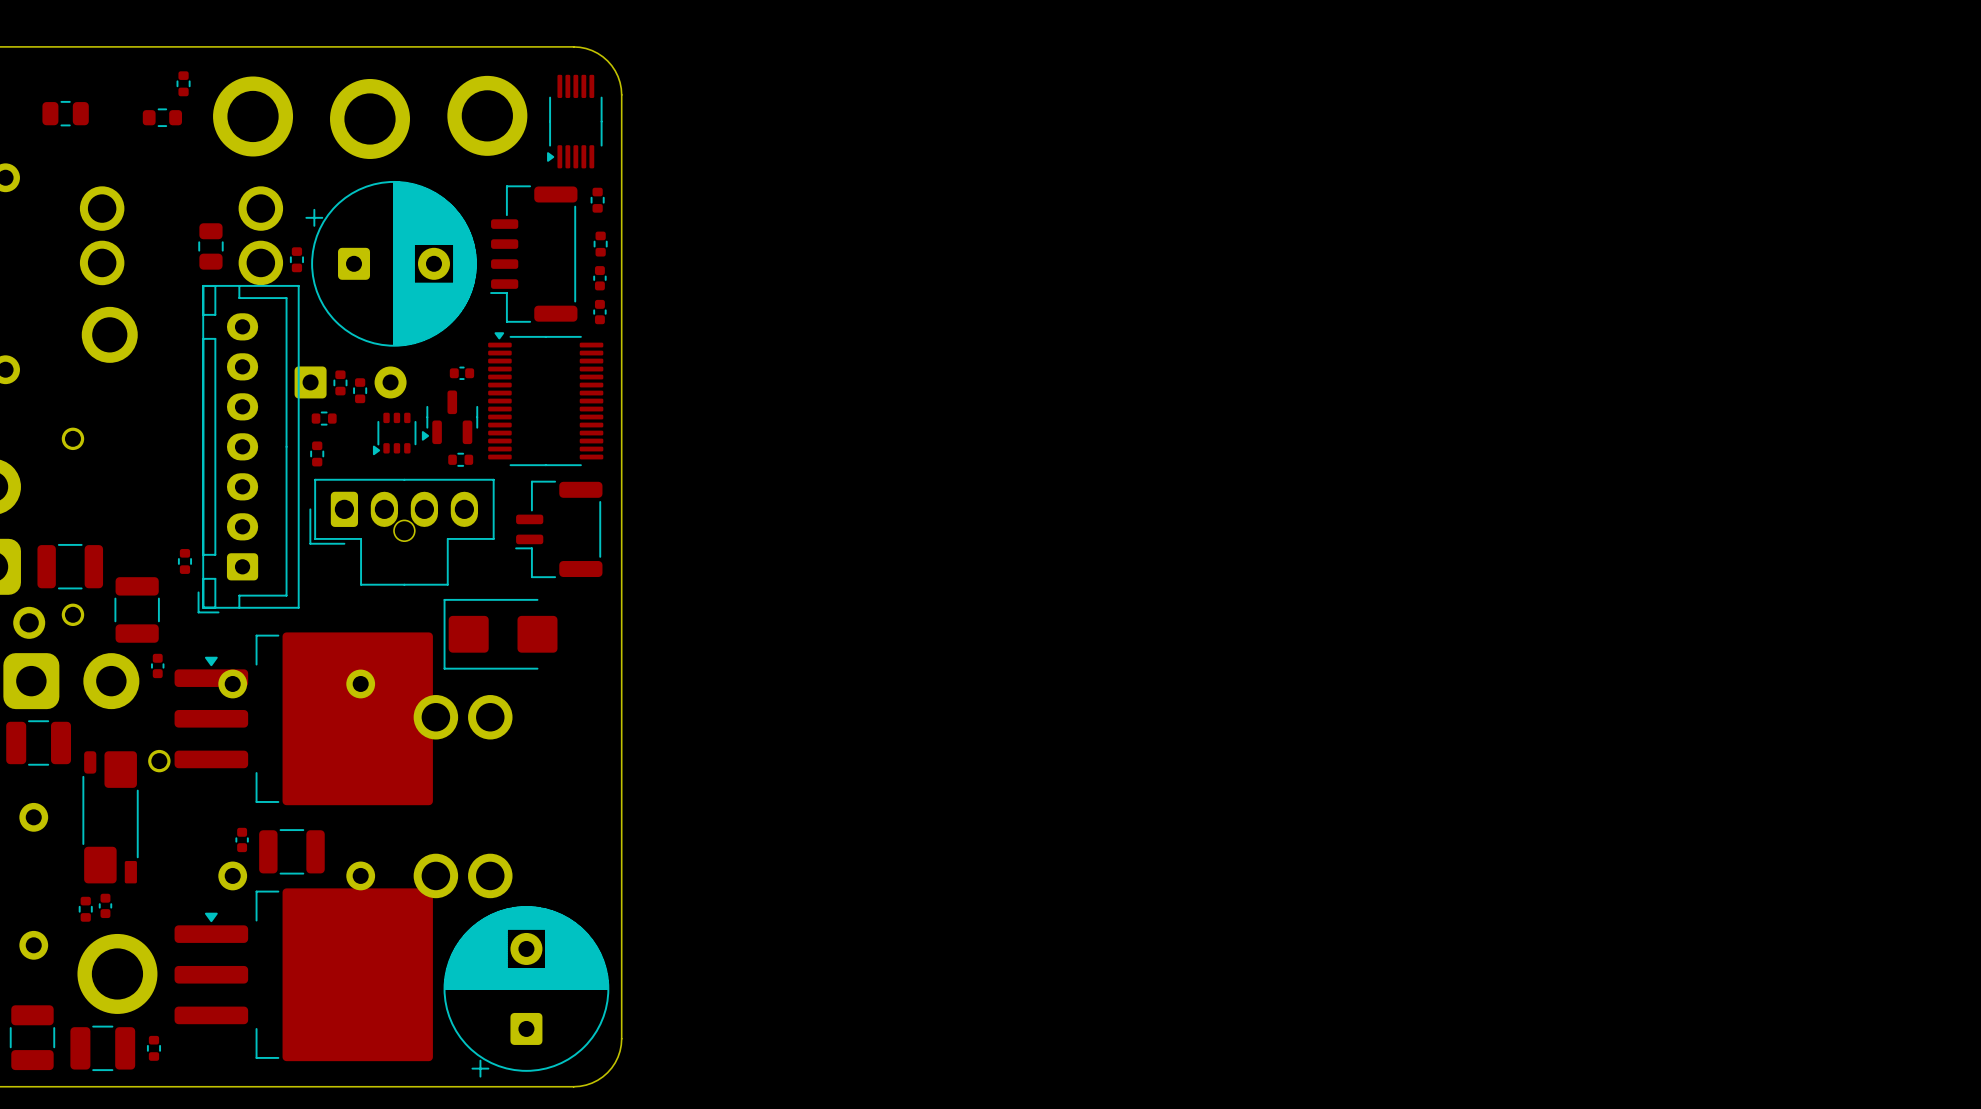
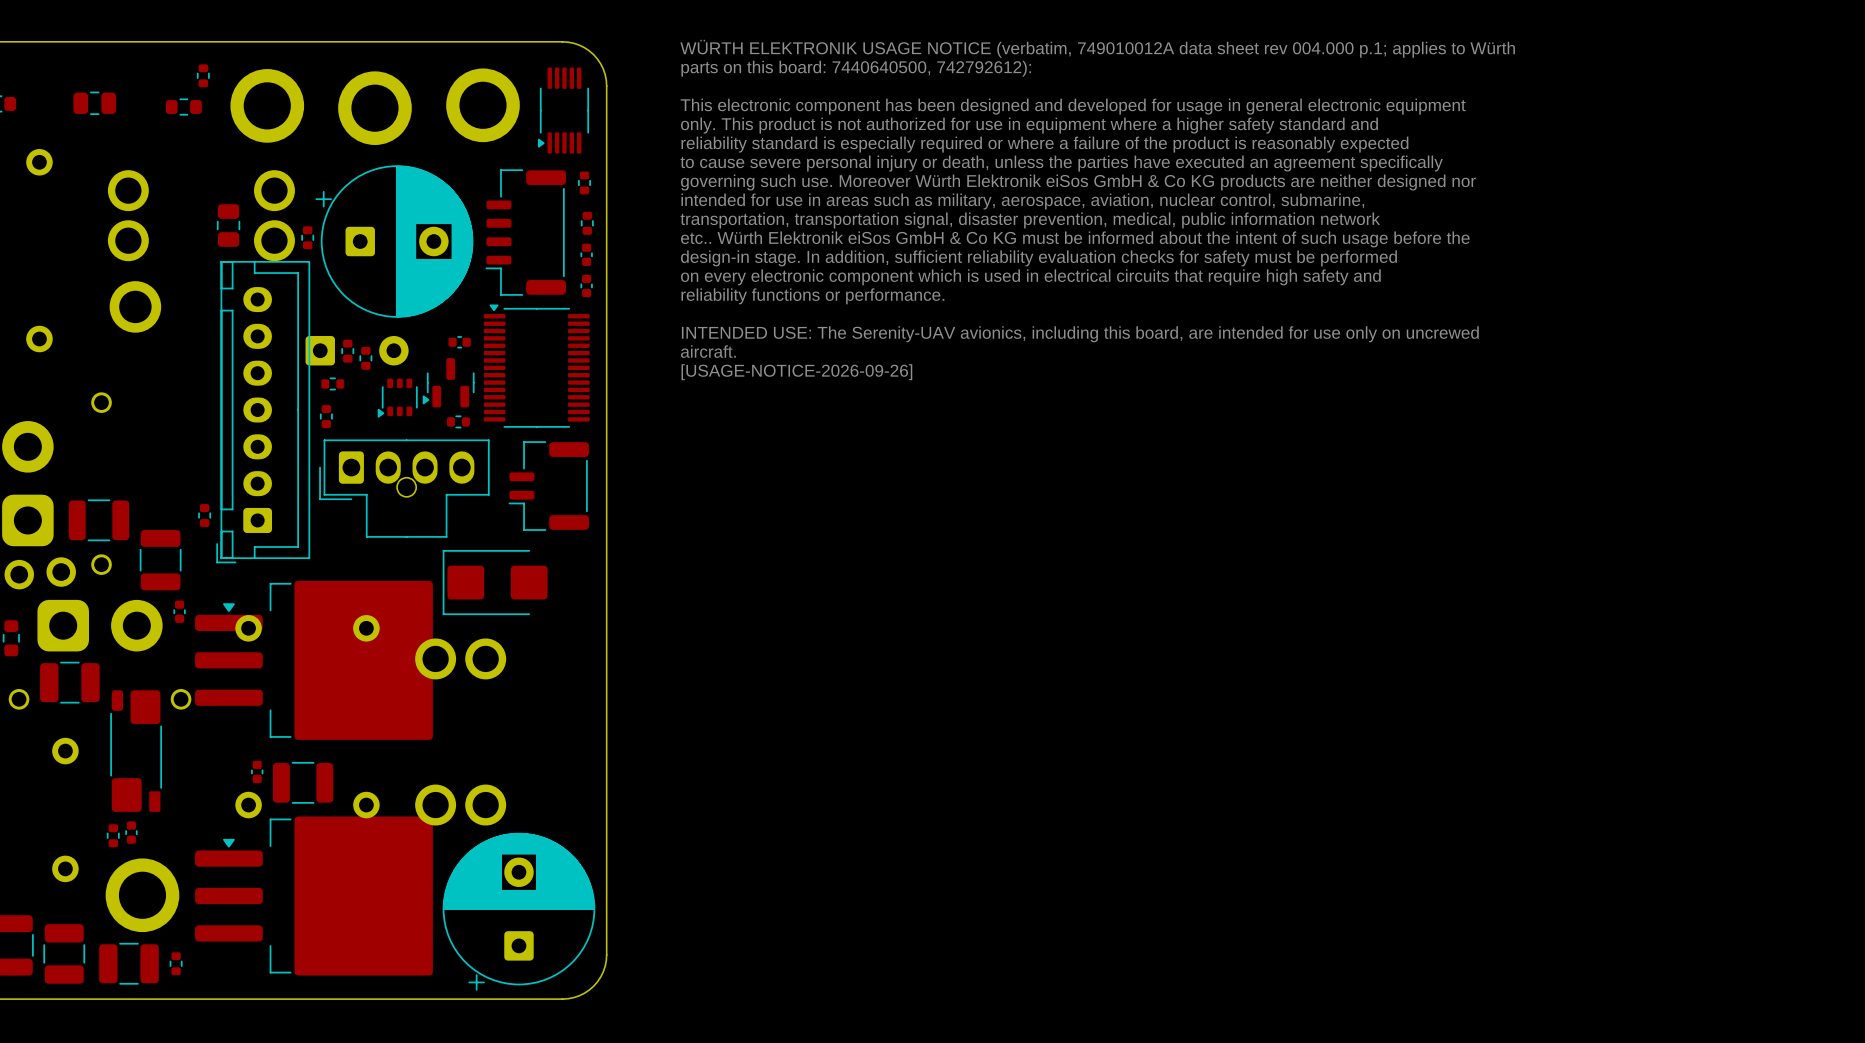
text: none -> WÜRTH ELEKTRONIK USAGE NOTICE (verbatim, 749010012A data sheet rev 004.000 p.1; applies to Würth (1097, 48)
text: none -> parts on this board: 7440640500, 742792612): (856, 68)
text: none -> This electronic component has been designed and developed for usage in general electronic equipment (1073, 106)
text: none -> only. This product is not authorized for use in equipment where a higher safety standard and (1029, 125)
text: none -> reliability standard is especially required or where a failure of the product is reasonably expected (1044, 144)
text: none -> to cause severe personal injury or death, unless the parties have executed an agreement specifically (1061, 163)
text: none -> governing such use. Moreover Würth Elektronik eiSos GmbH & Co KG products are neither designed nor (1078, 182)
text: none -> intended for use in areas such as military, aerospace, aviation, nuclear control, submarine, (1022, 201)
text: none -> transportation, transportation signal, disaster prevention, medical, public information network (1030, 220)
text: none -> etc.. Würth Elektronik eiSos GmbH & Co KG must be informed about the intent of such usage before the (1075, 239)
text: none -> design-in stage. In addition, sufficient reliability evaluation checks for safety must be performed (1038, 258)
text: none -> on every electronic component which is used in electrical circuits that require high safety and (1030, 277)
text: none -> reliability functions or performance. (812, 296)
text: none -> INTENDED USE: The Serenity-UAV avionics, including this board, are intended for use only on uncrewed (1080, 334)
text: none -> aircraft. (708, 351)
text: none -> [USAGE-NOTICE-2026-09-26] (796, 372)

